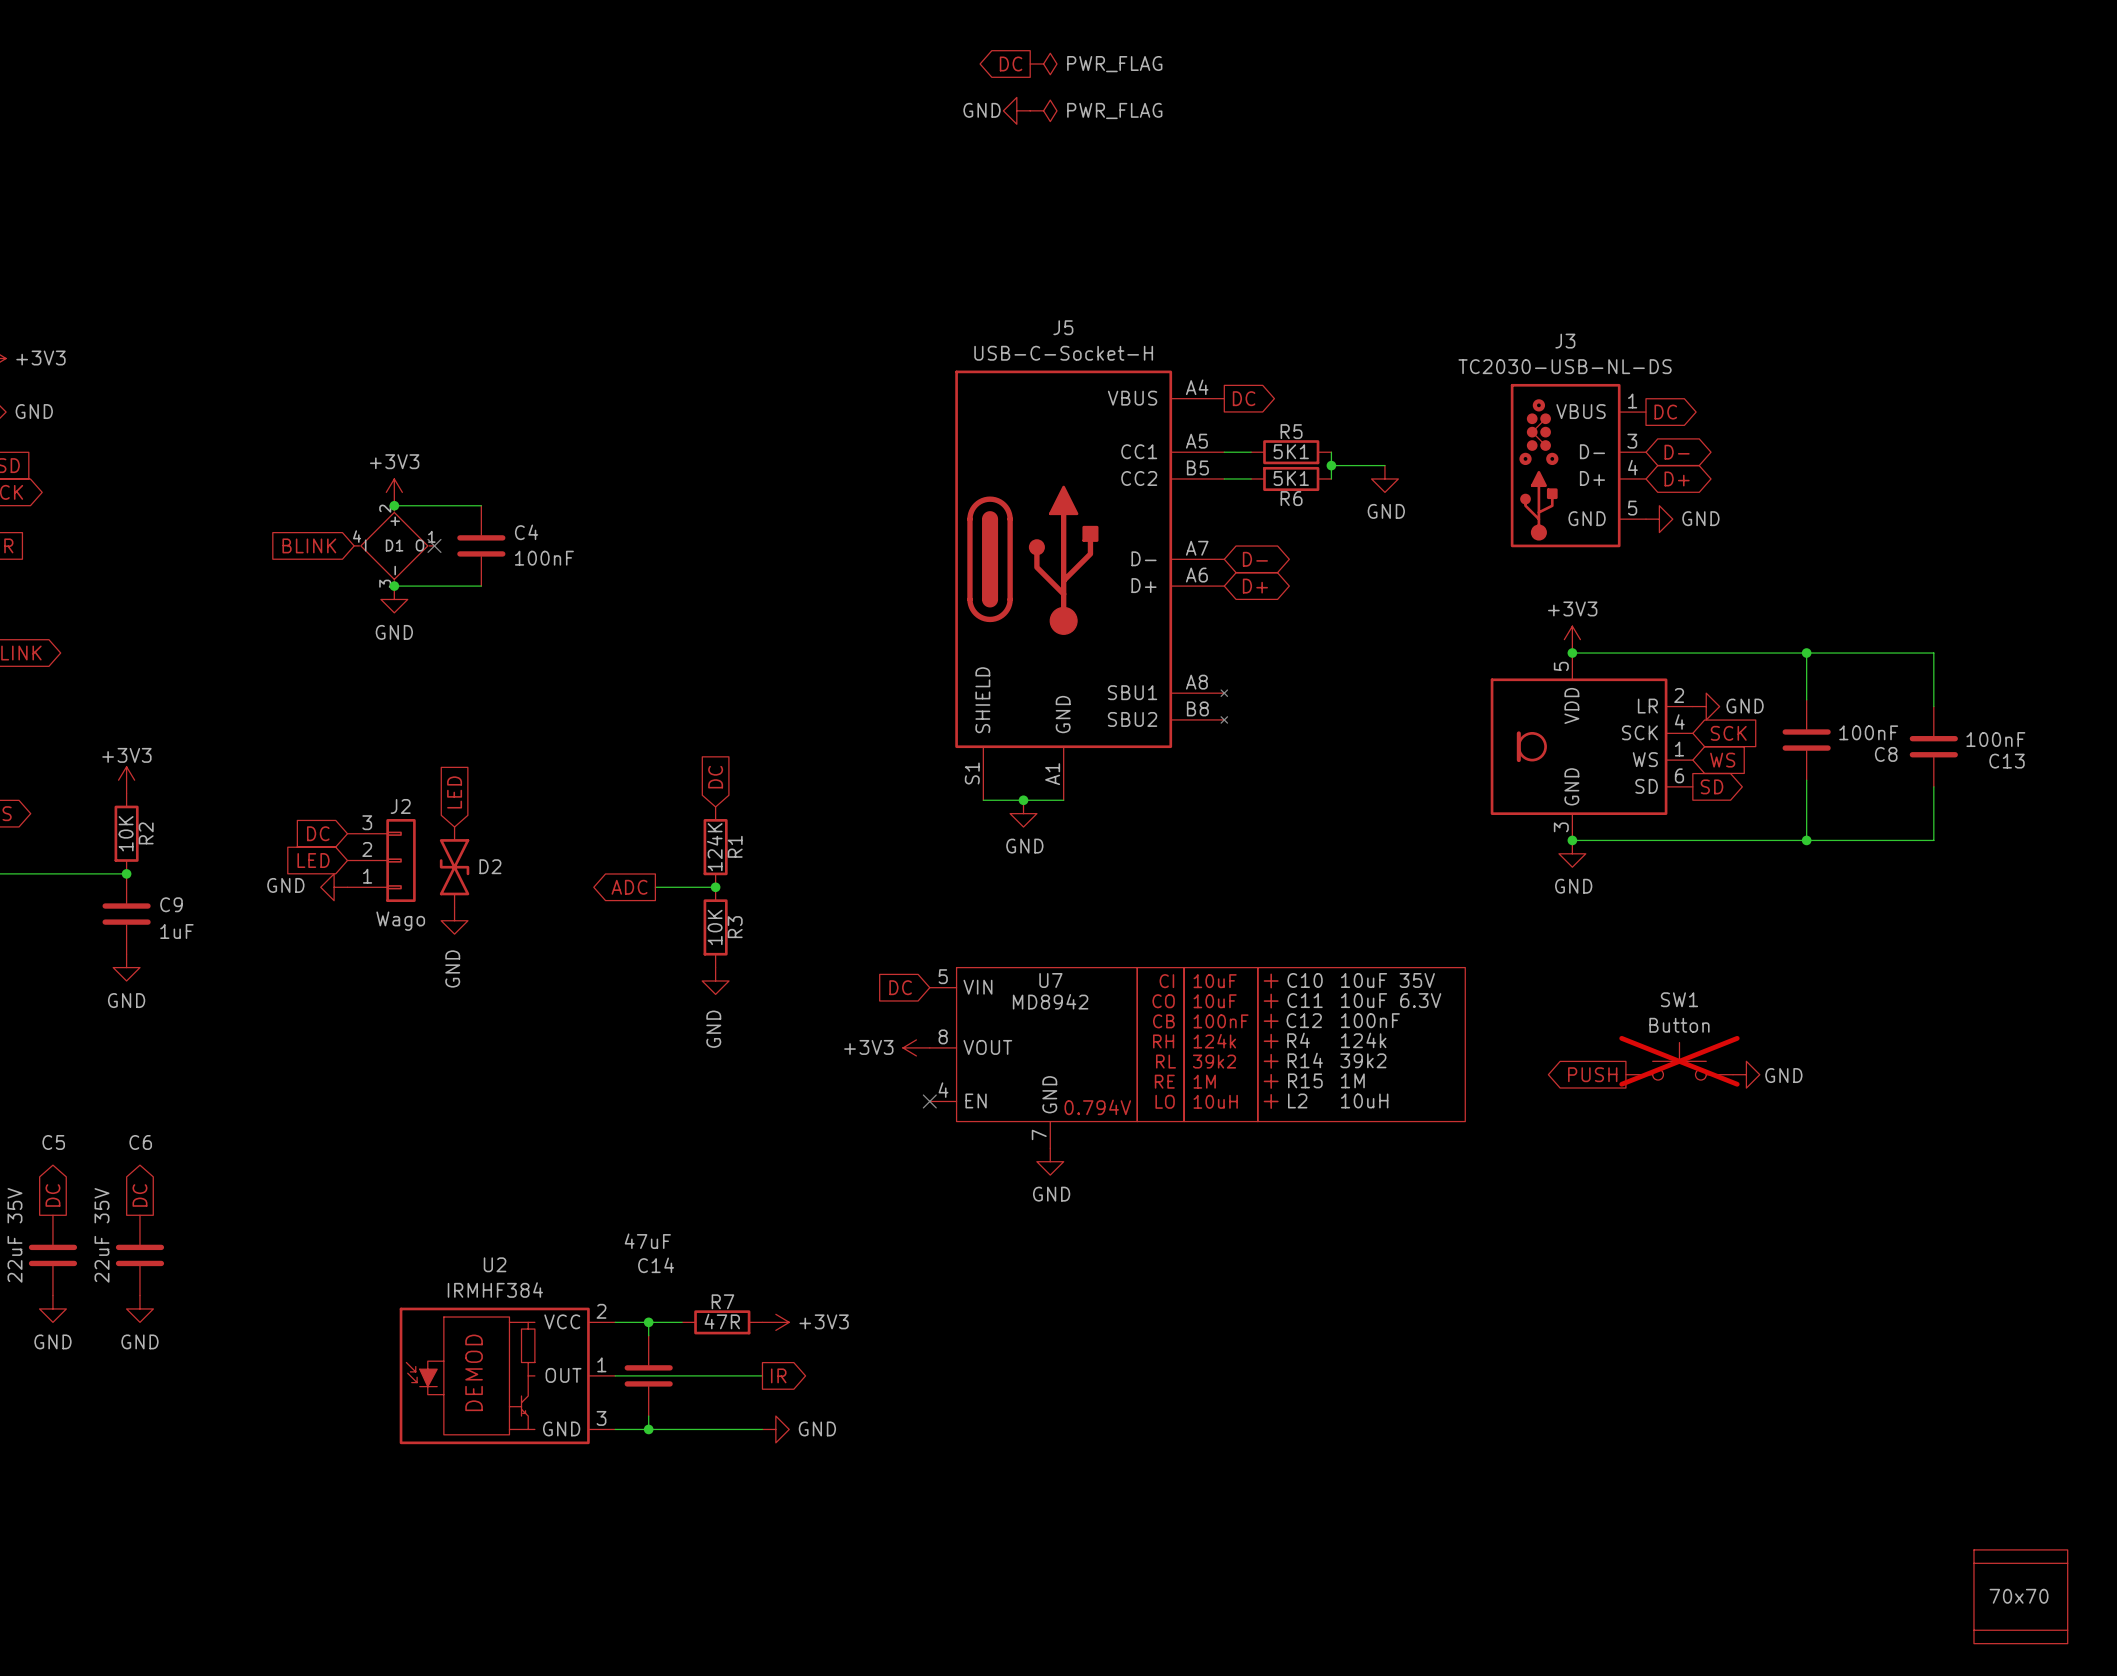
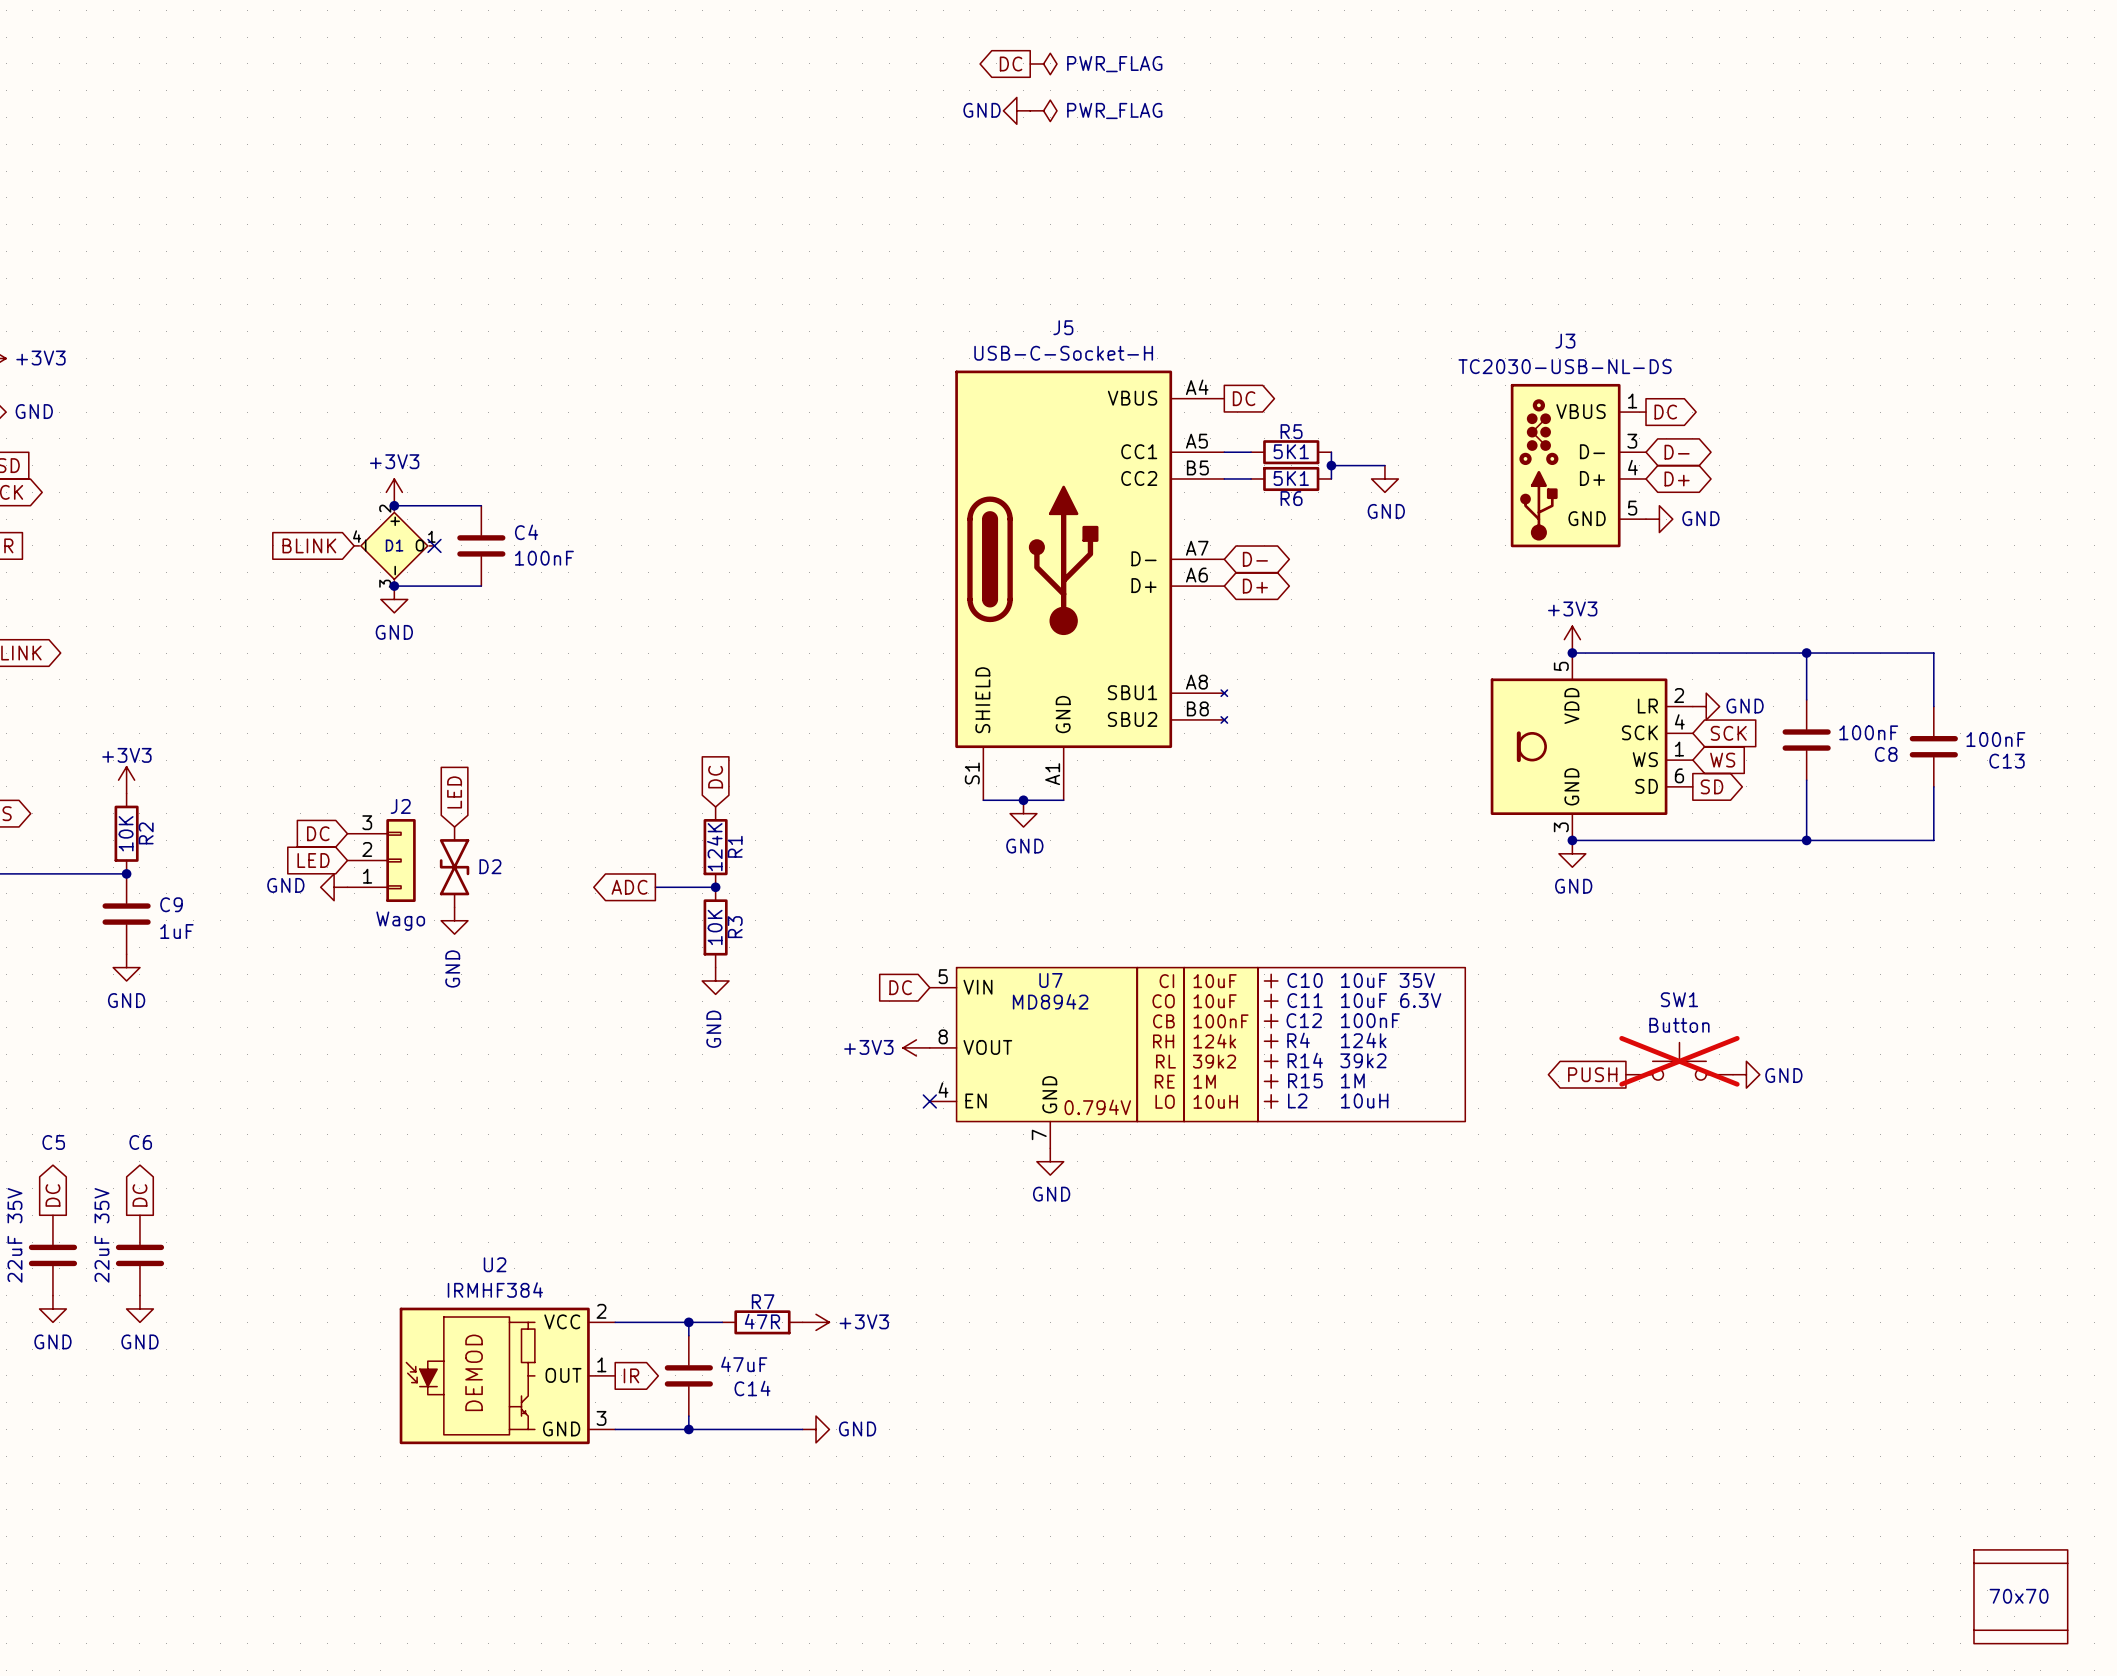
C14 value position: 47uF (647, 1241) -> 47uF (744, 1364)
C14 name position: C14 (656, 1265) -> C14 (752, 1388)
wire: (648, 1322) (648, 1335) -> (688, 1322) (688, 1335)
junction position: (648, 1322) -> (688, 1322)
wire: none -> (682, 1322) (722, 1322)
R7 position: (722, 1322) -> (762, 1322)
power symbol position: +3V3 (775, 1322) -> +3V3 (816, 1322)
wire: (615, 1375) (762, 1375) -> none
C14 position: (648, 1375) -> (688, 1375)
global label position: IR (778, 1375) -> IR (631, 1375)
wire: (648, 1416) (648, 1429) -> (688, 1416) (688, 1429)
junction position: (648, 1429) -> (688, 1429)
wire: none -> (762, 1429) (802, 1429)
power symbol position: GND (775, 1429) -> GND (816, 1429)

